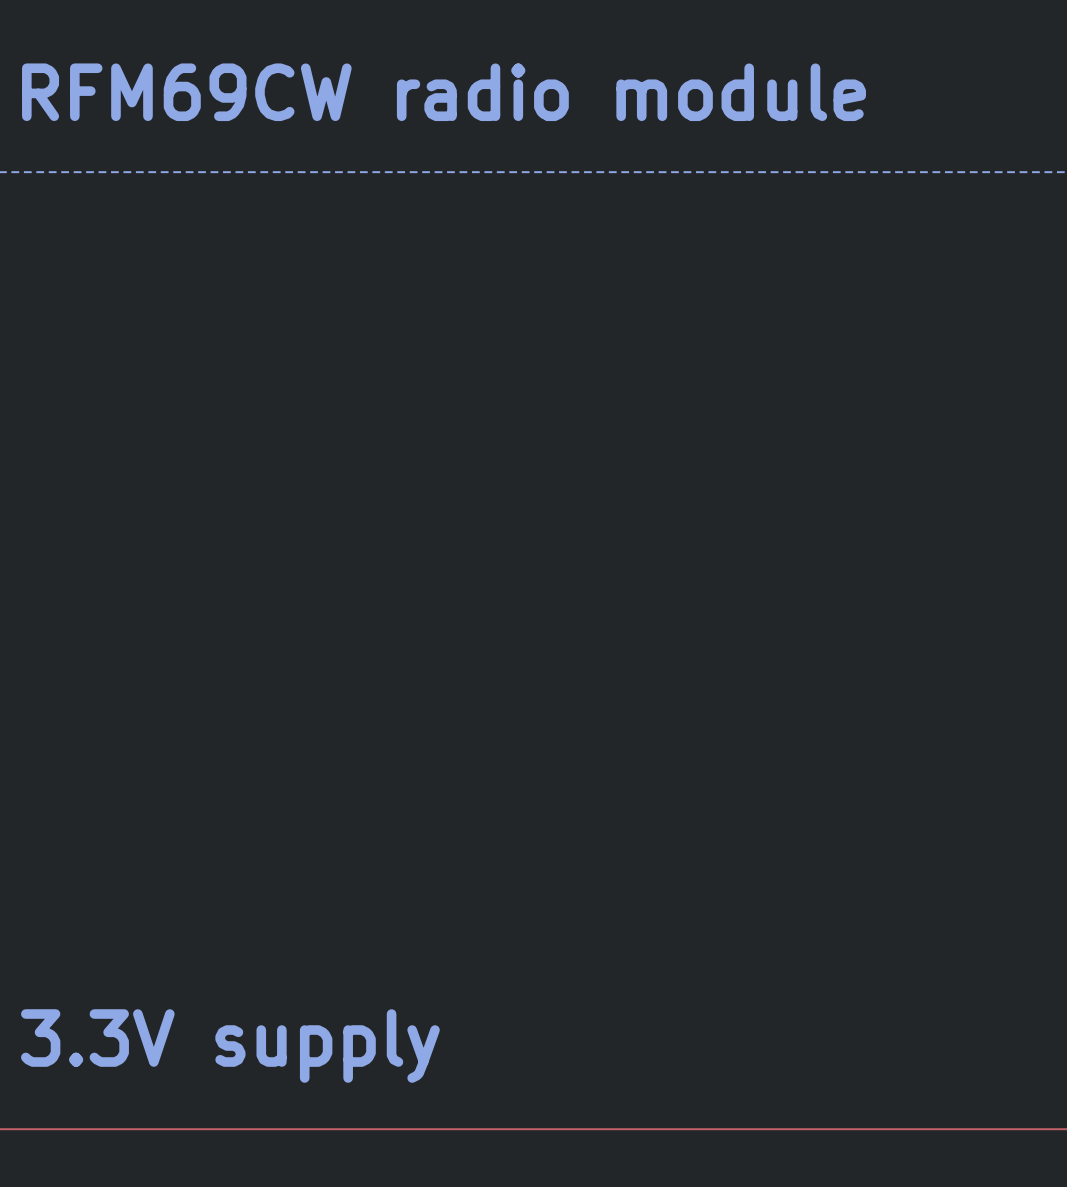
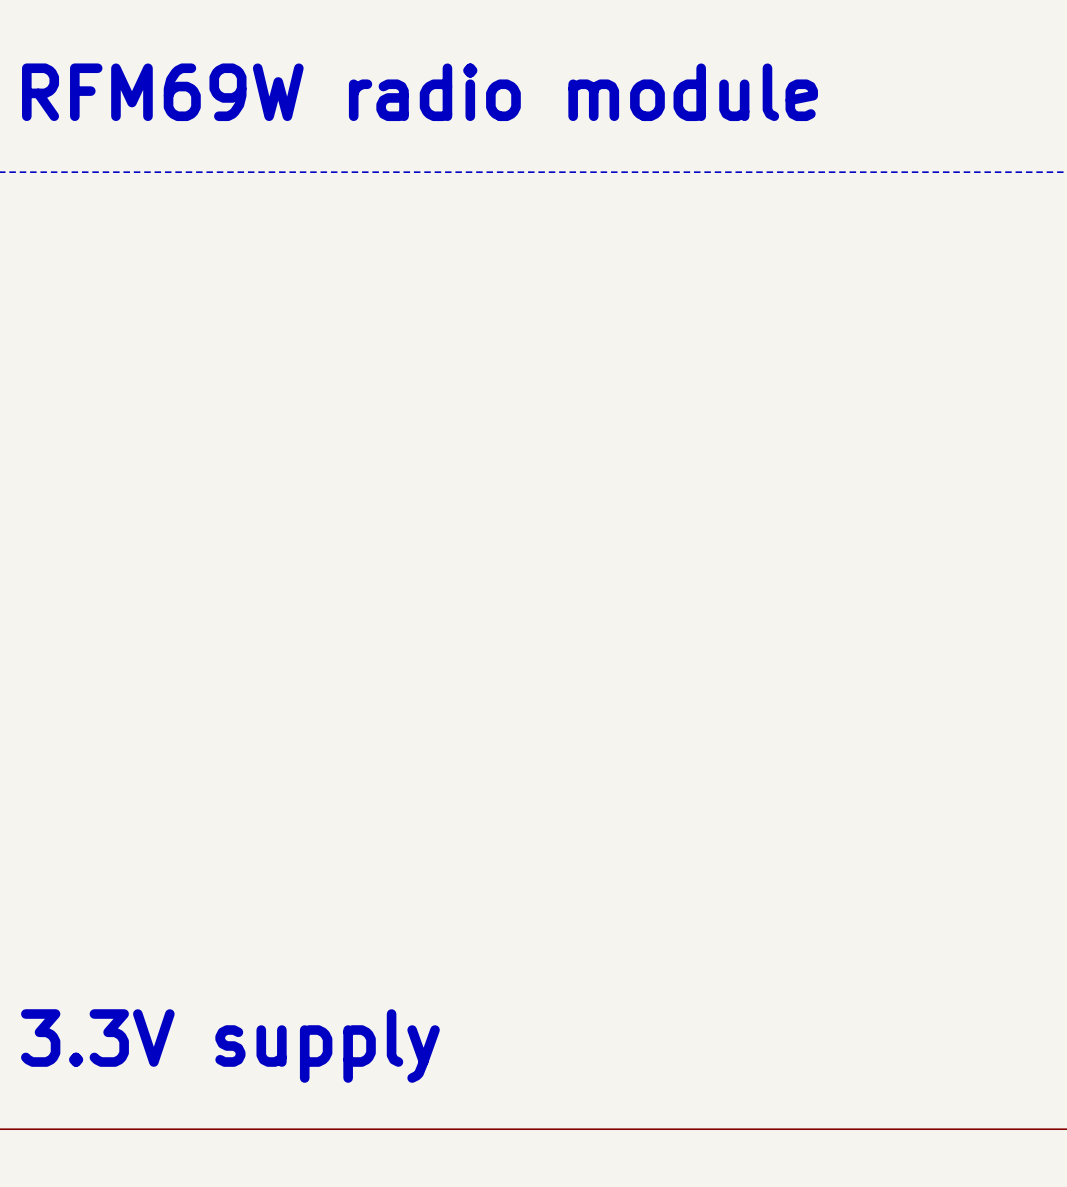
text: RFM69CW radio module (444, 92) -> RFM69W radio module (420, 92)

